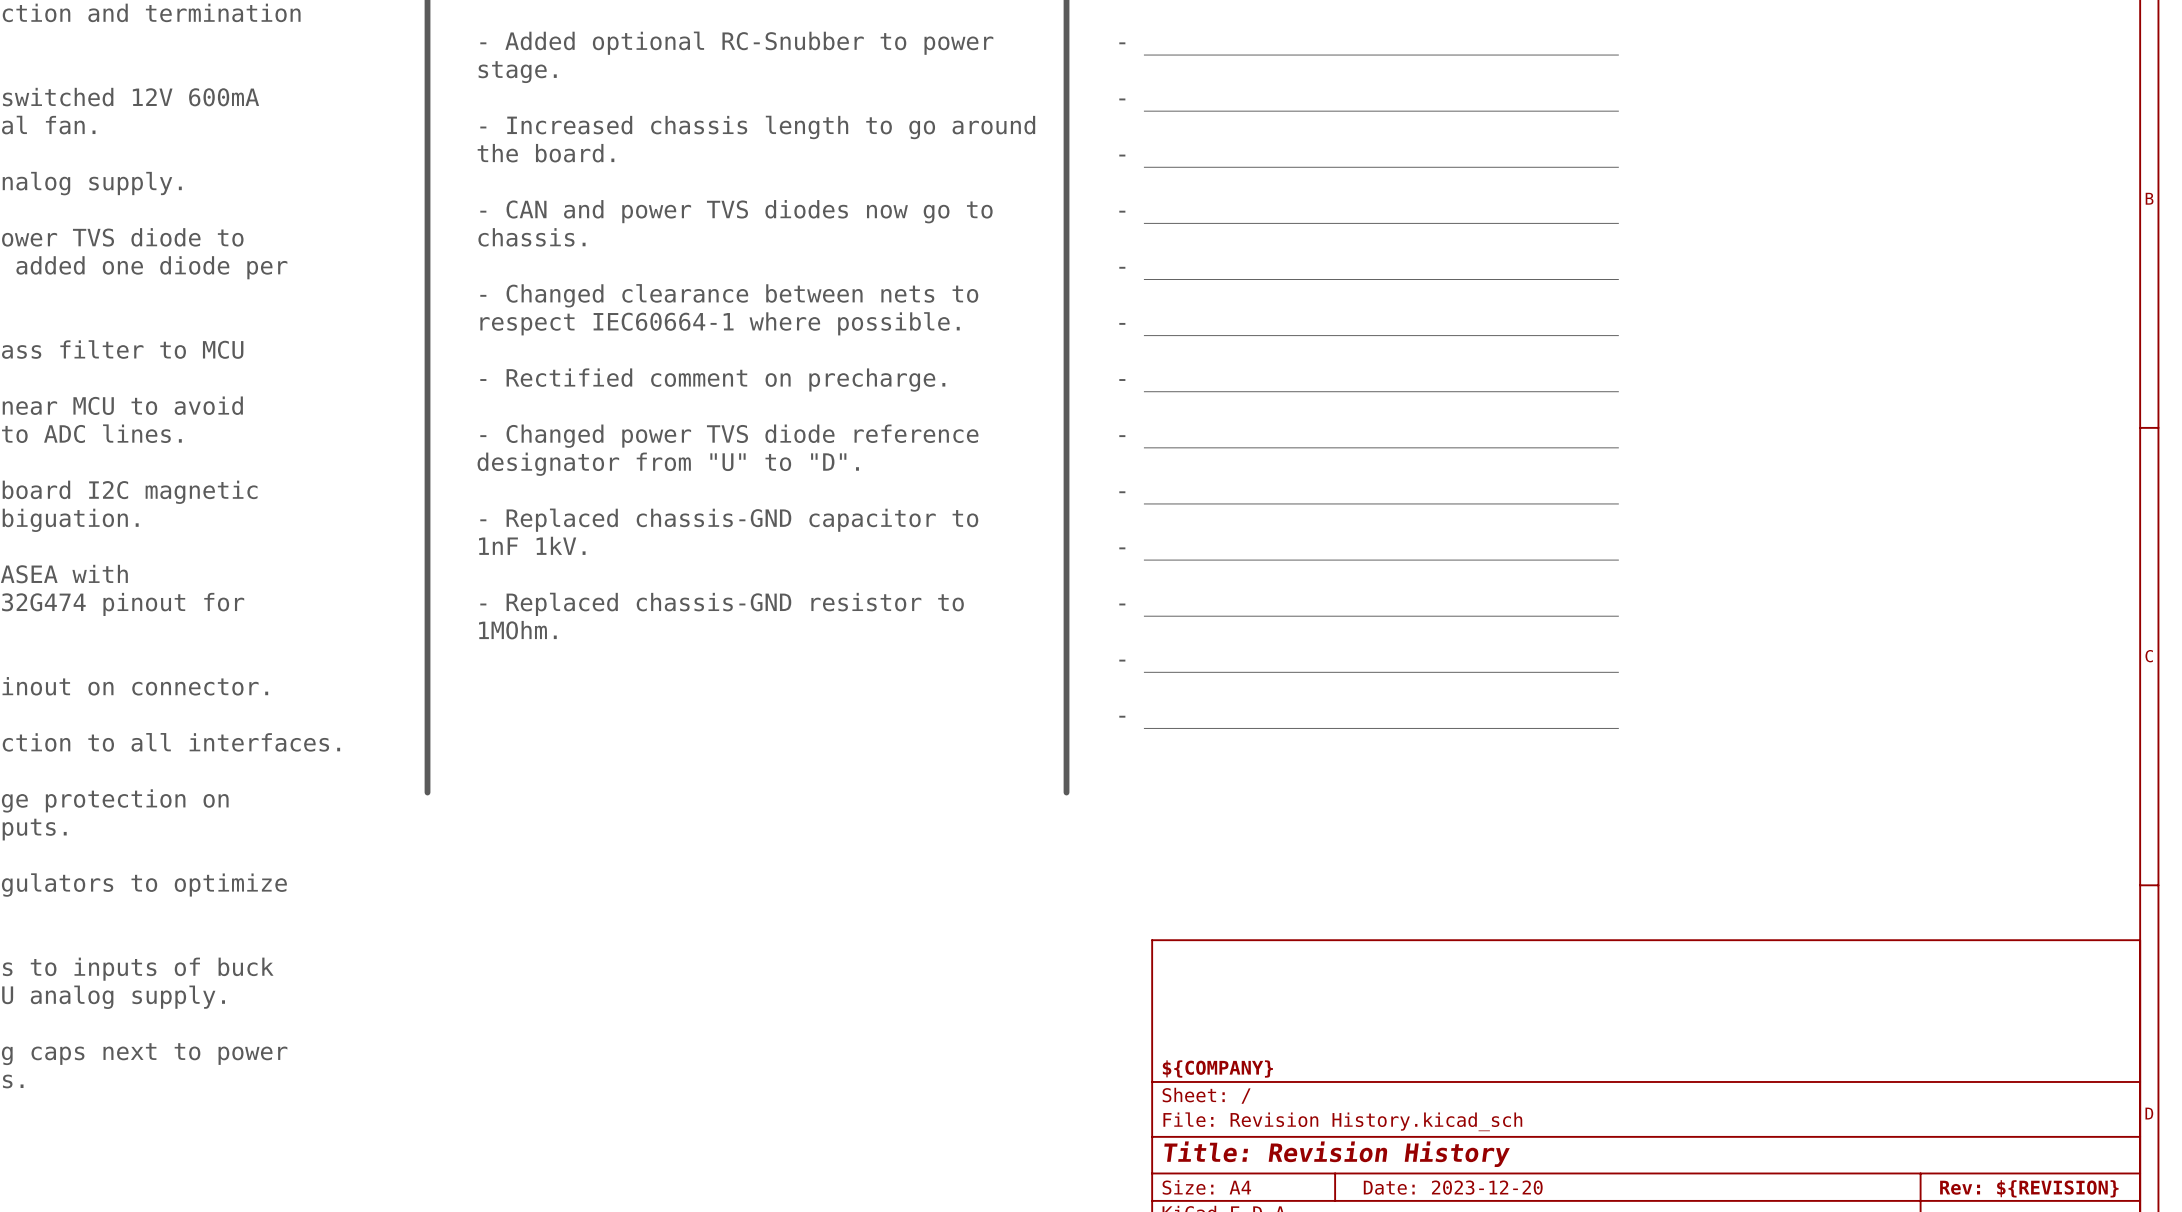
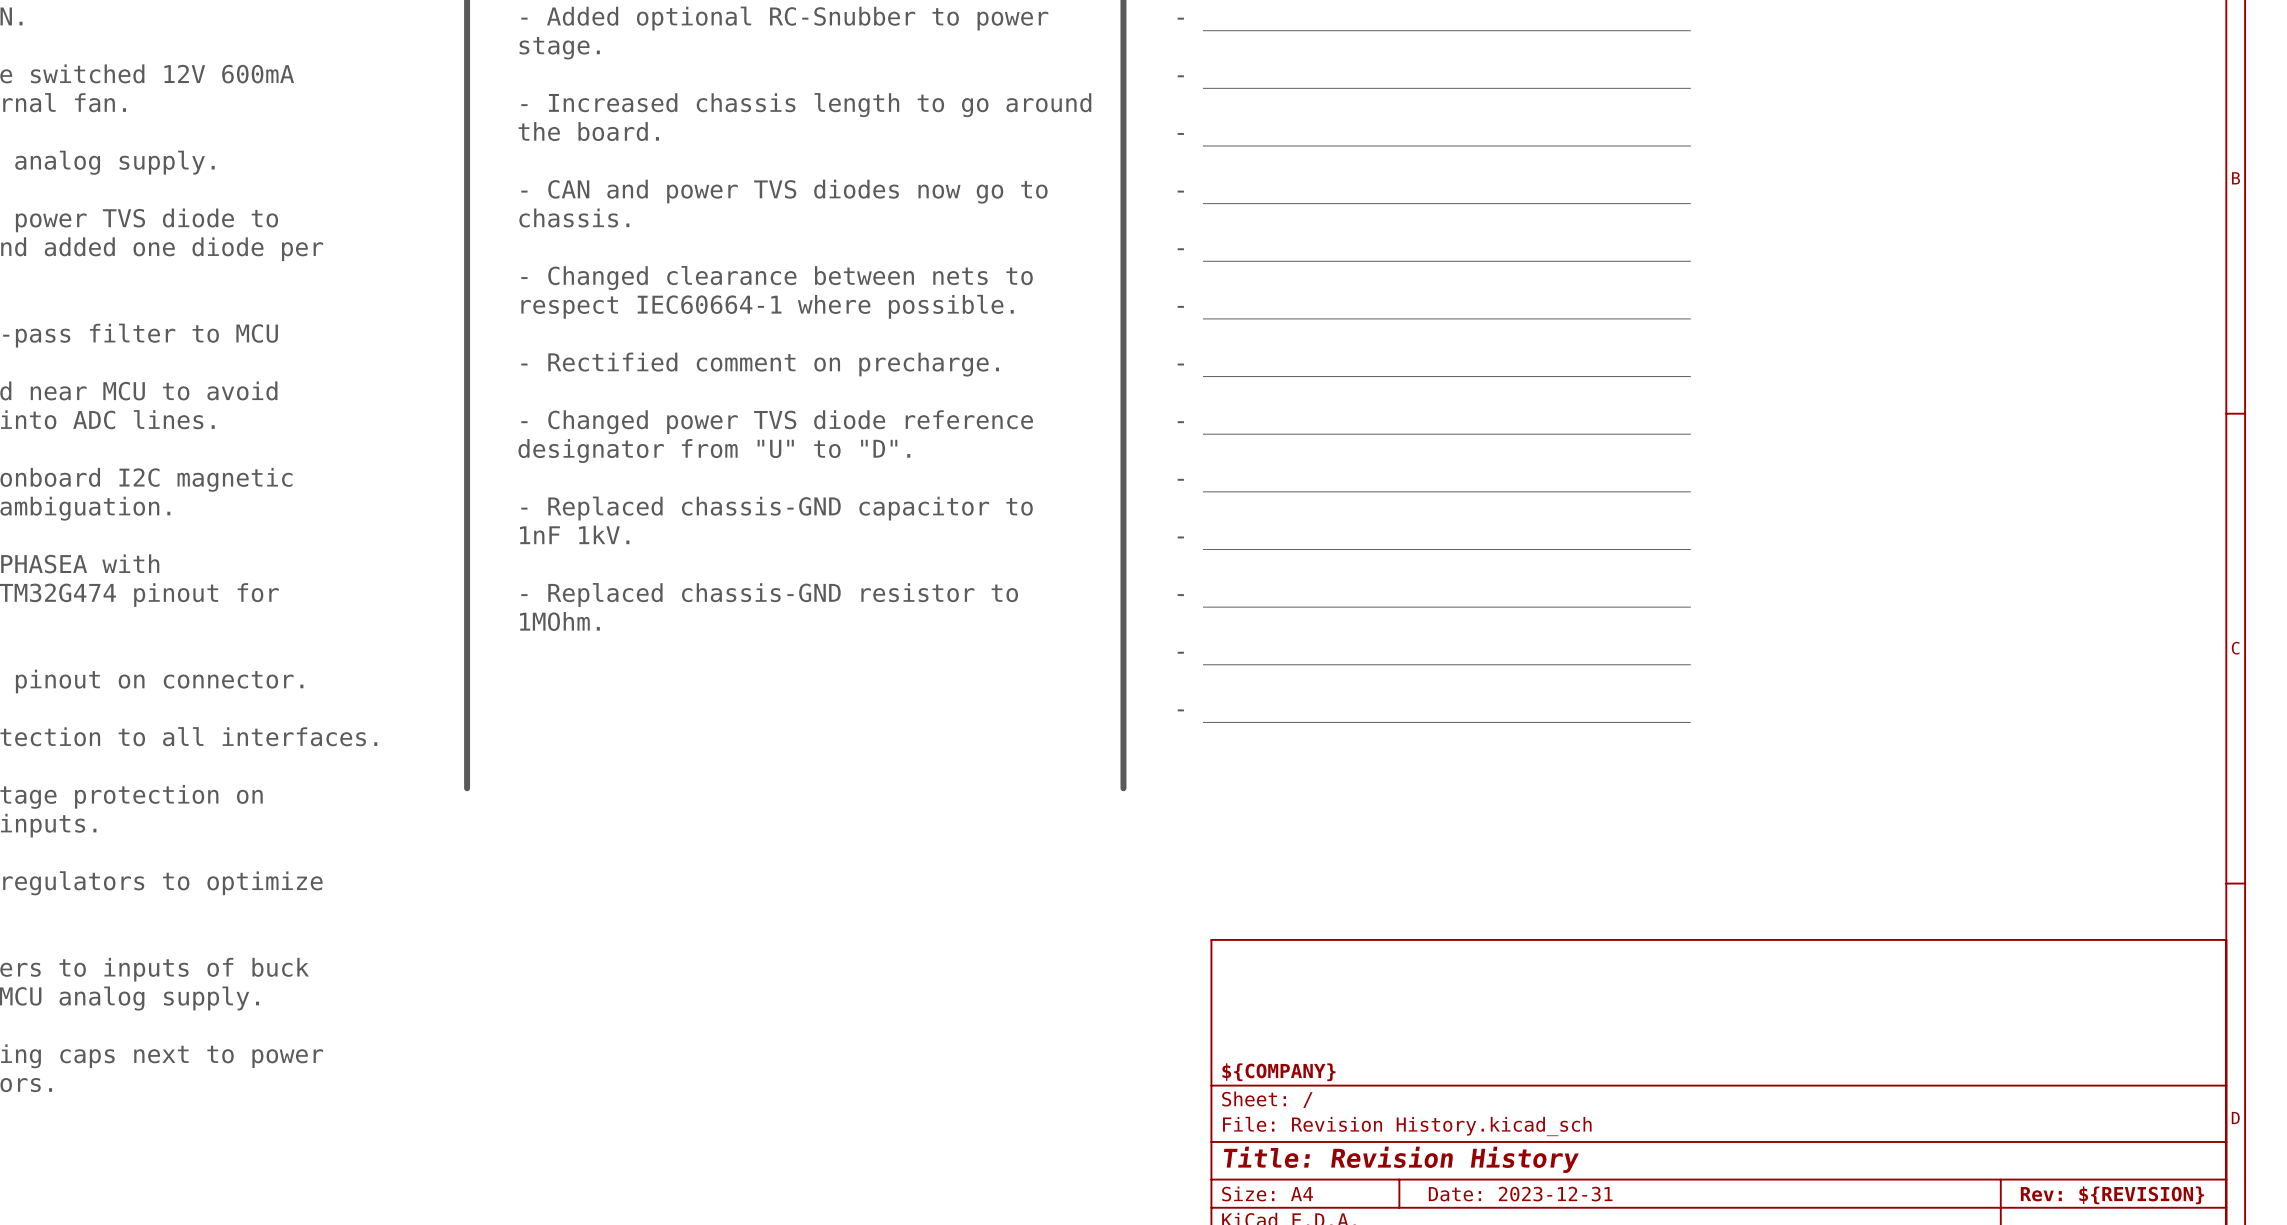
title block: Date: 2023-12-20 (1453, 1187) -> Date: 2023-12-31 (1520, 1194)

